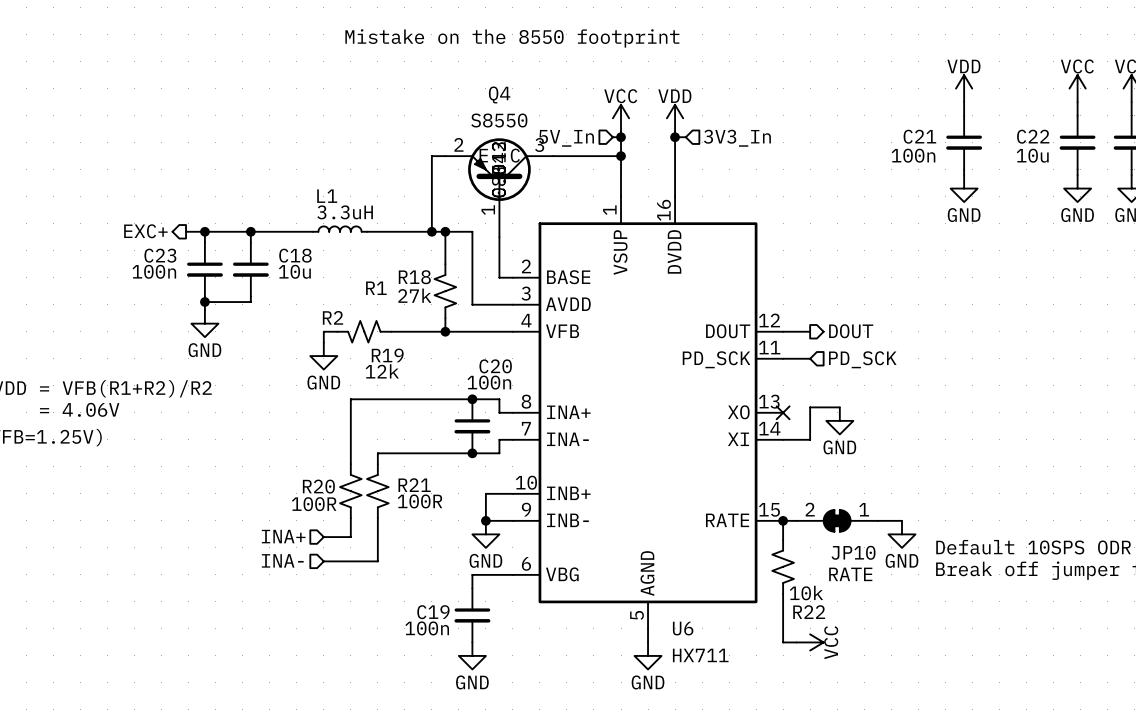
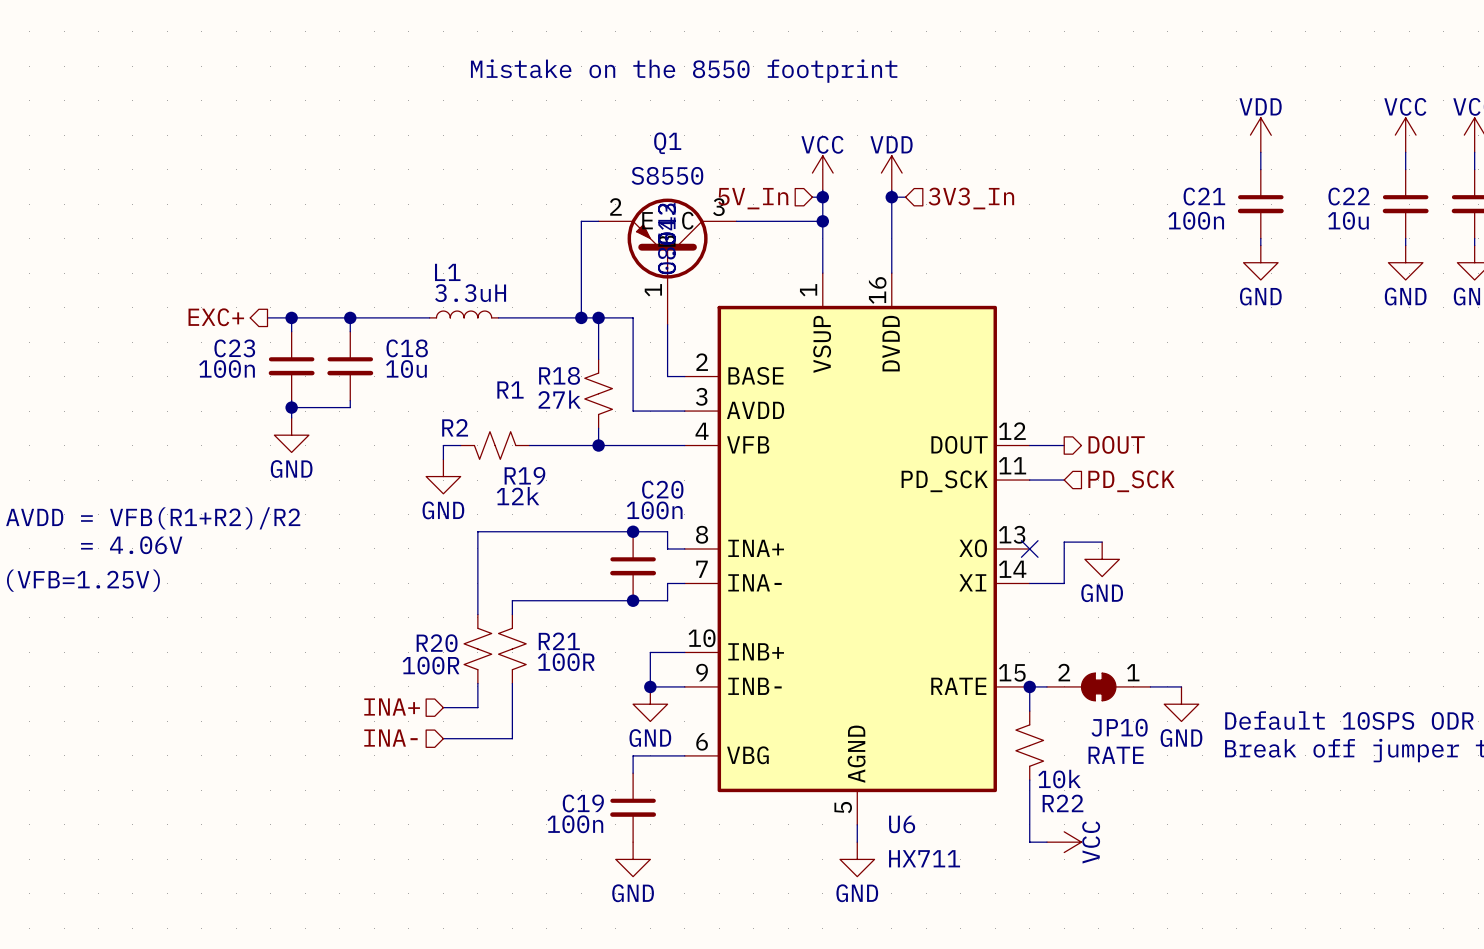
Q4 name: Q4 (499, 94) -> Q1 (667, 143)

